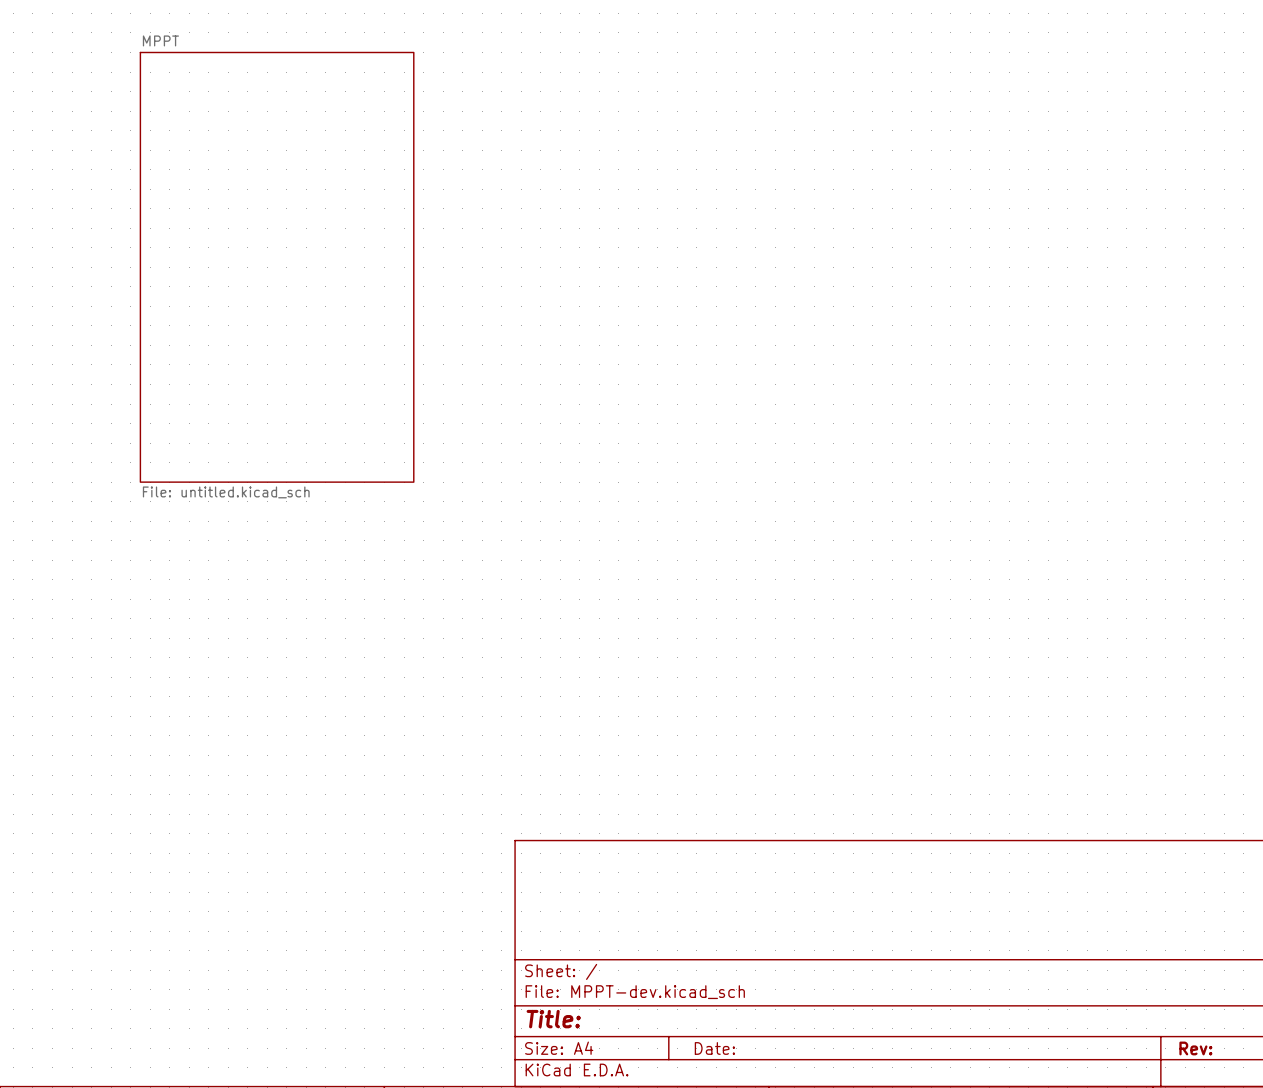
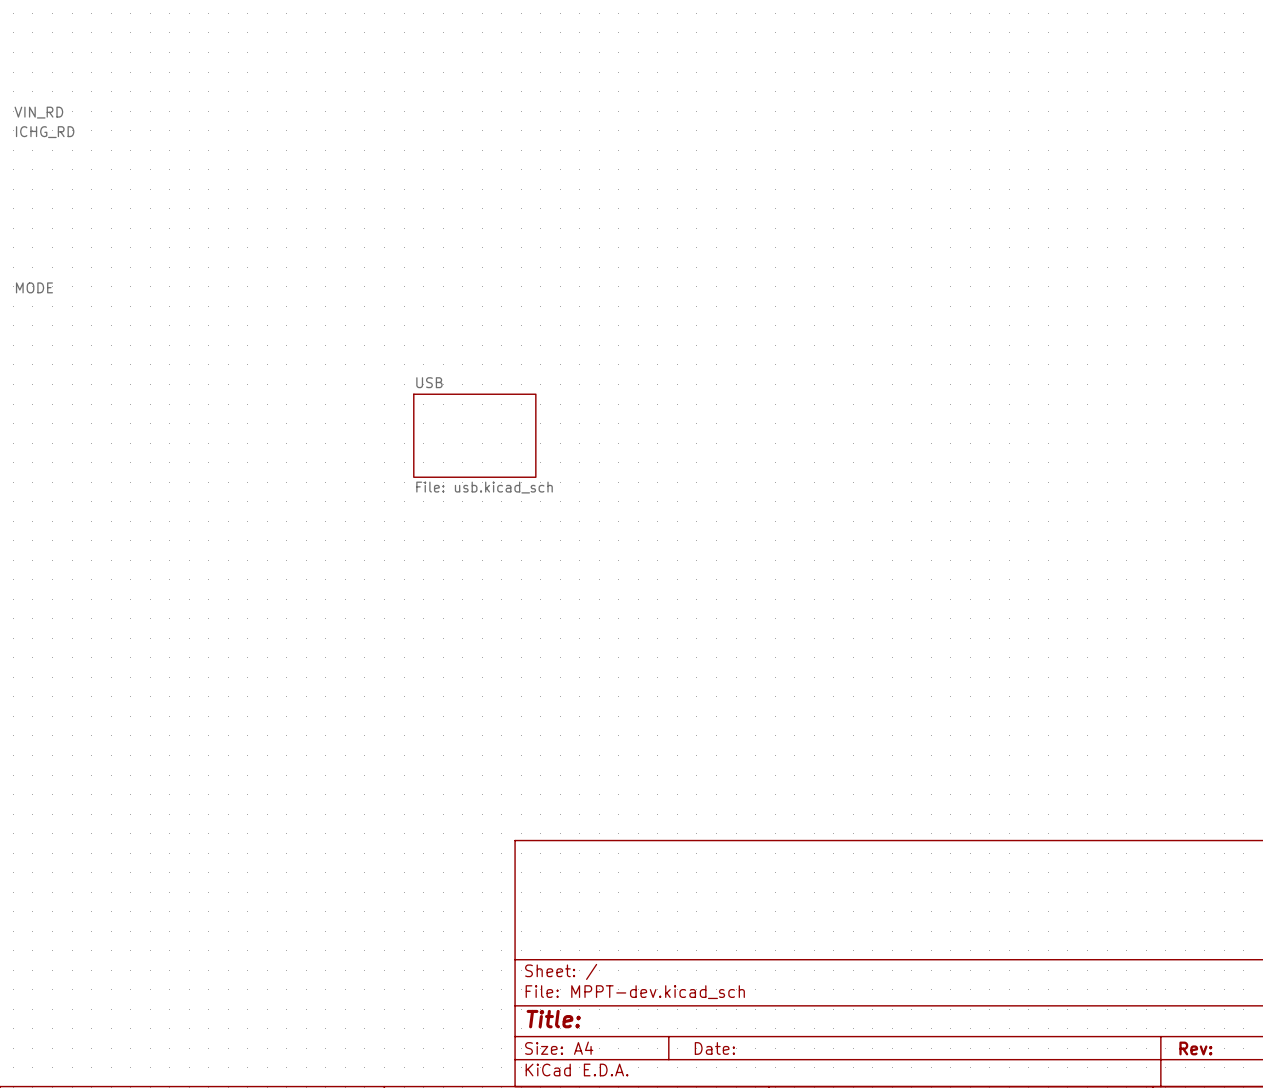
label: none -> VIN_RD (38, 112)
label: none -> ICHG_RD (45, 132)
sheet MPPT: File: untitled.kicad_sch (277, 267) -> none
label: none -> MODE (34, 287)
sheet USB: none -> File: usb.kicad_sch (474, 435)

